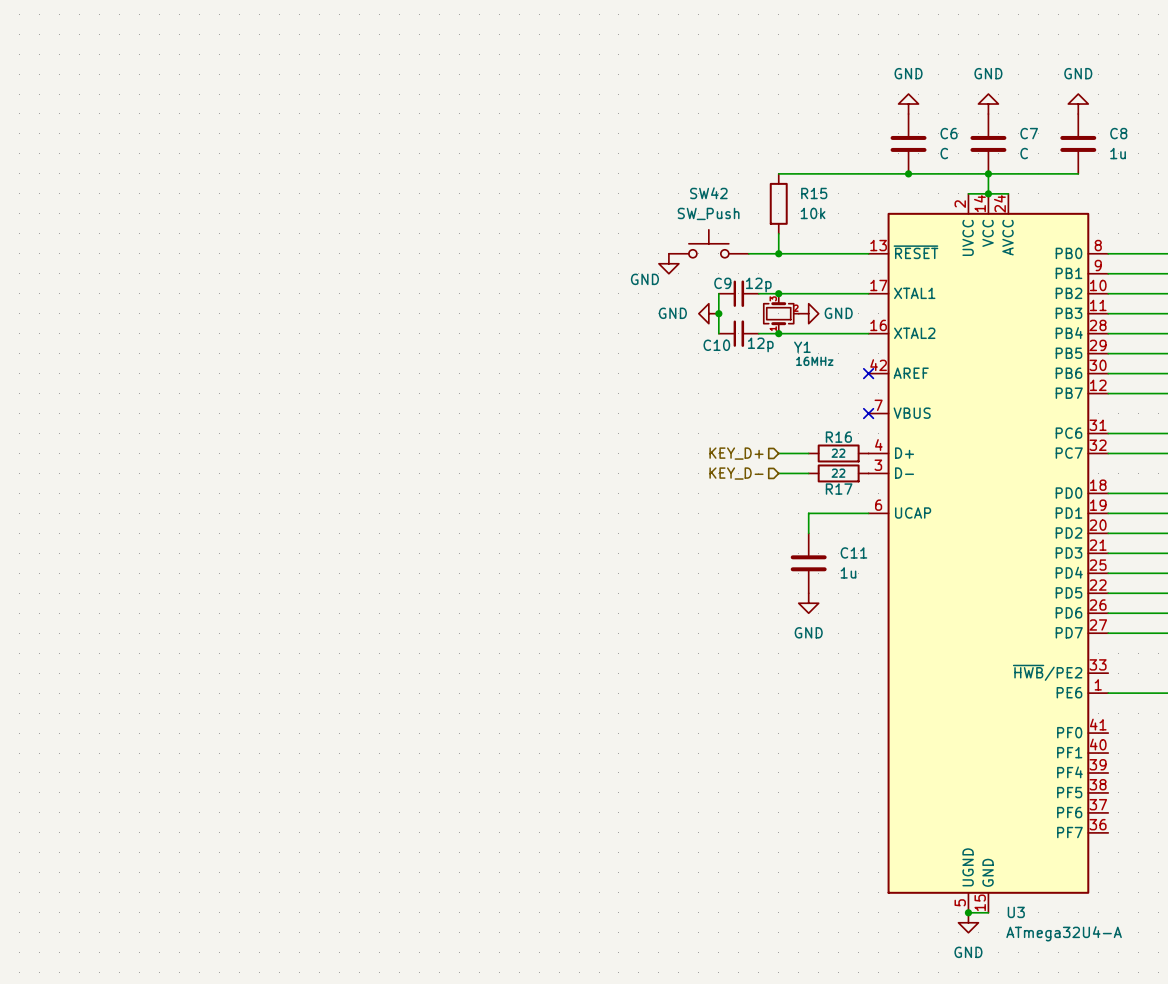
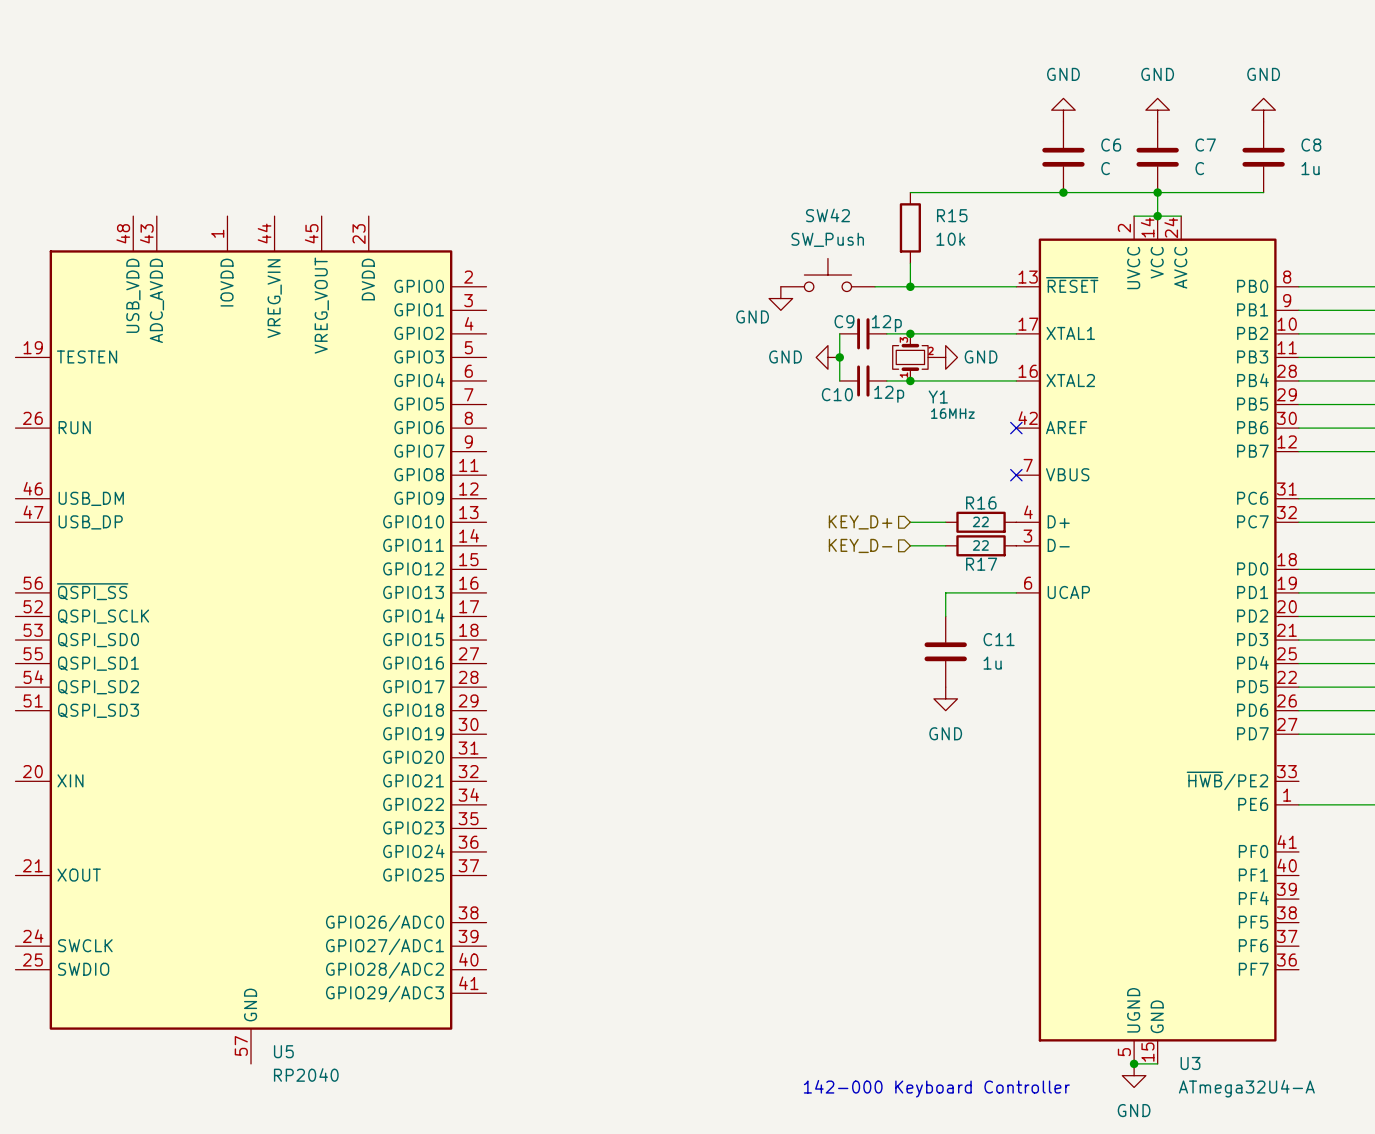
U5: none -> RP2040 (251, 640)
text: none -> 142-000 Keyboard Controller (936, 1088)

